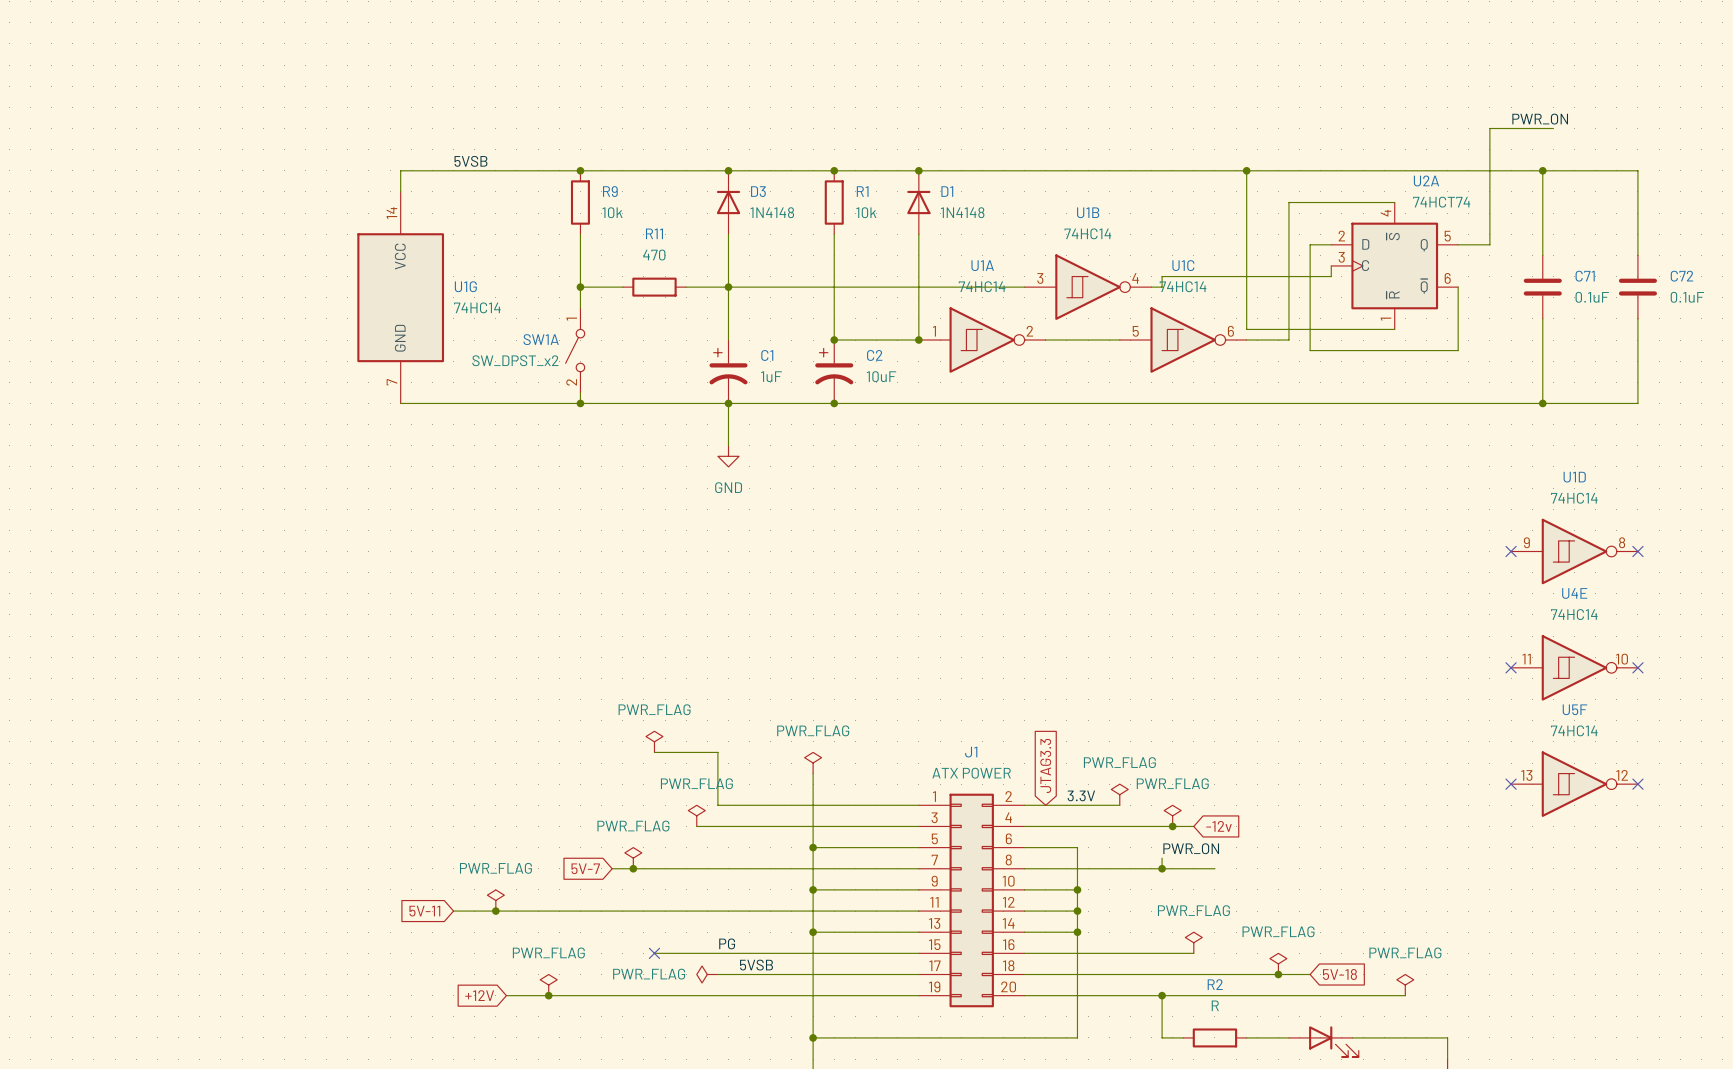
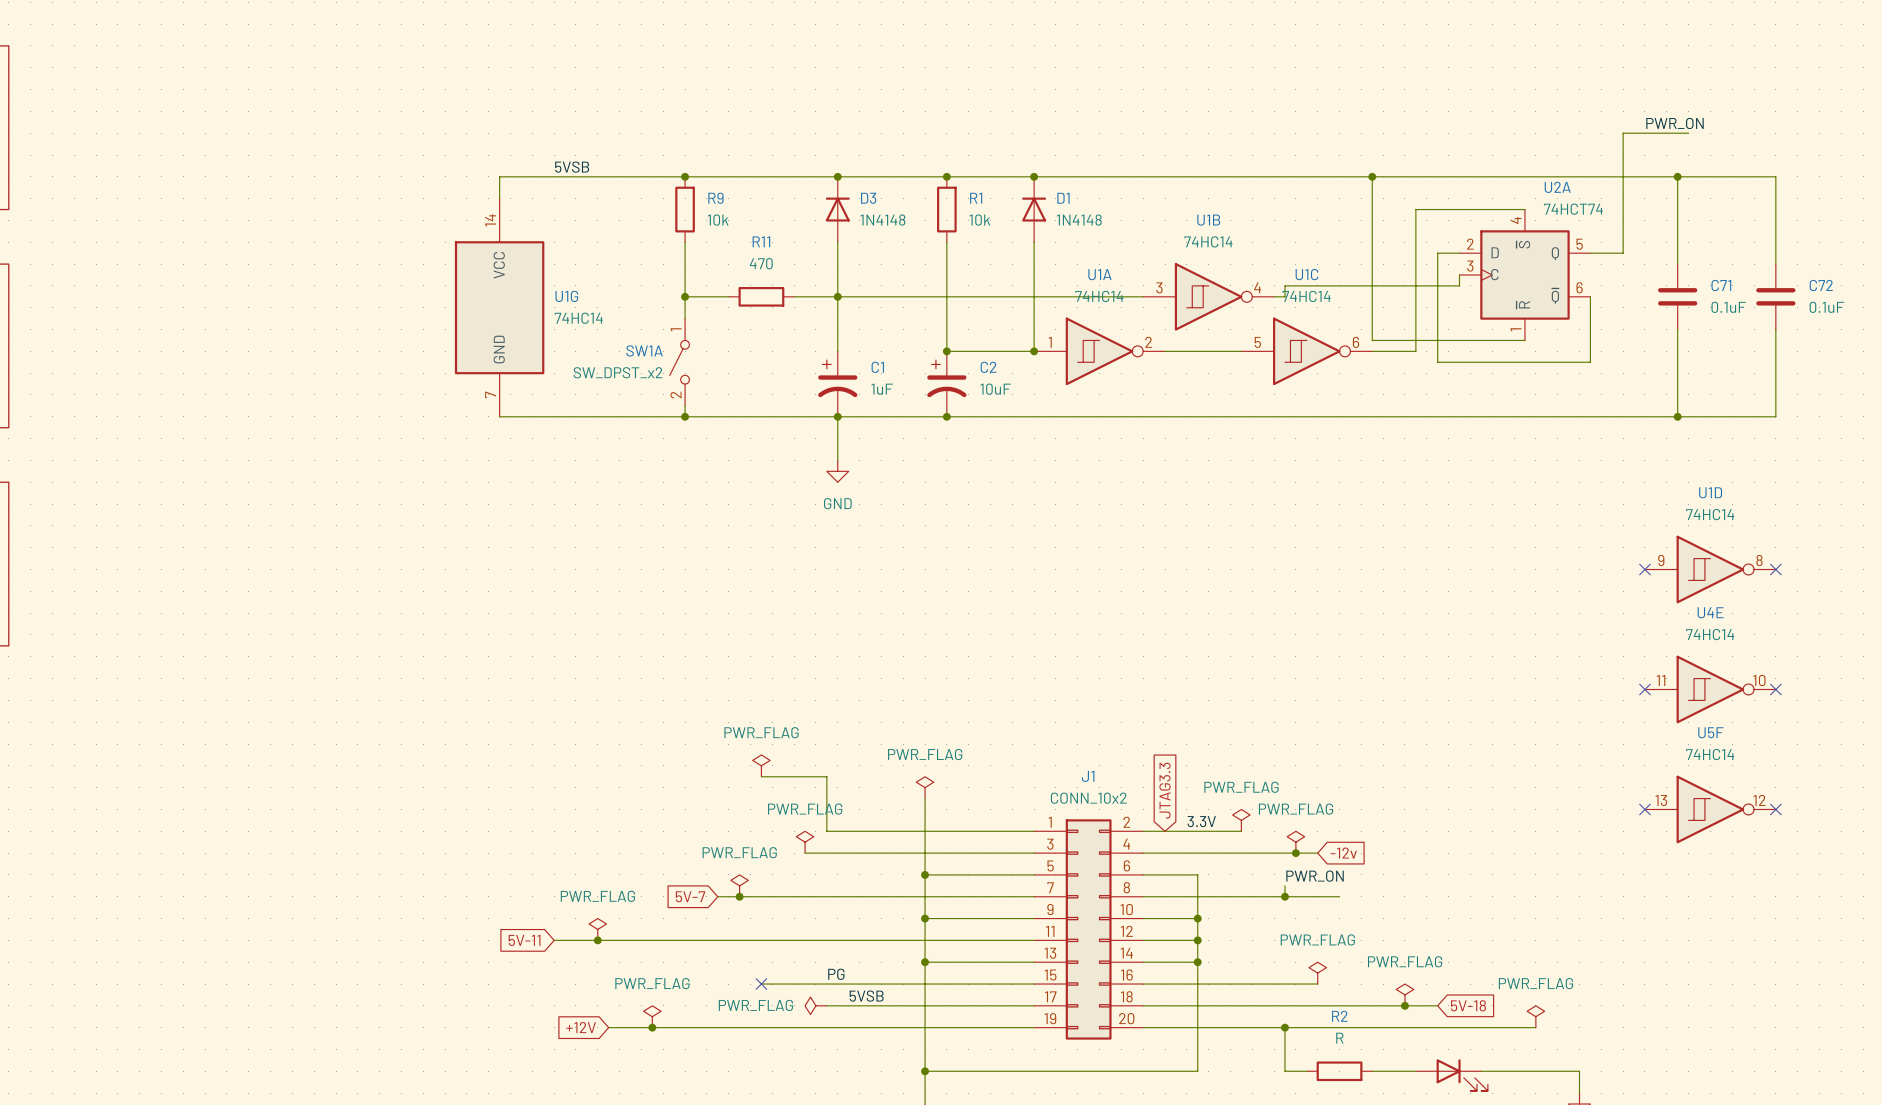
J1 value: ATX POWER (971, 773) -> CONN_10x2 (1088, 798)

